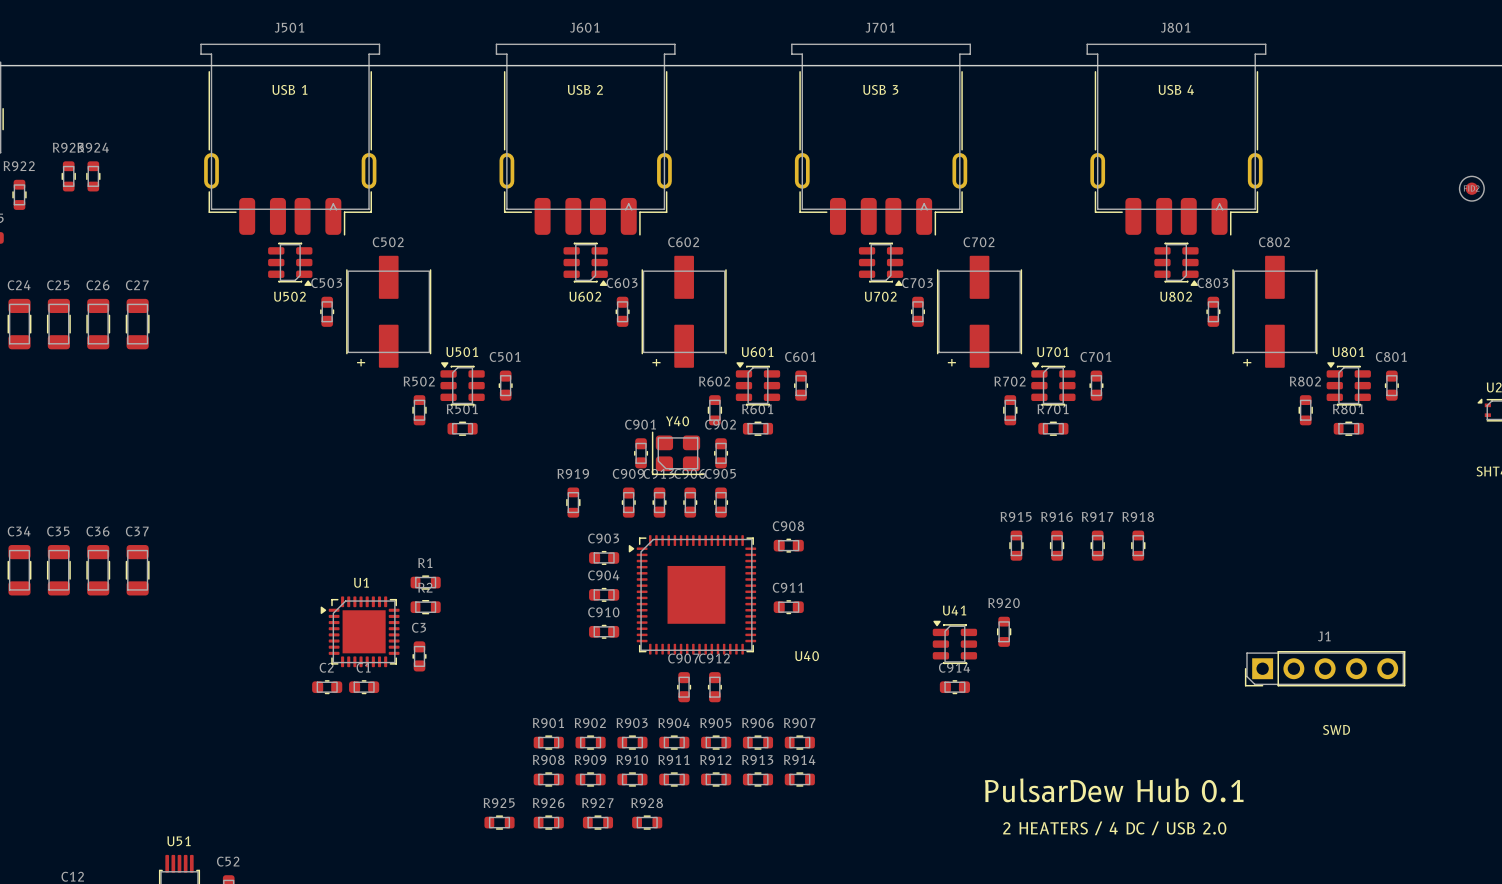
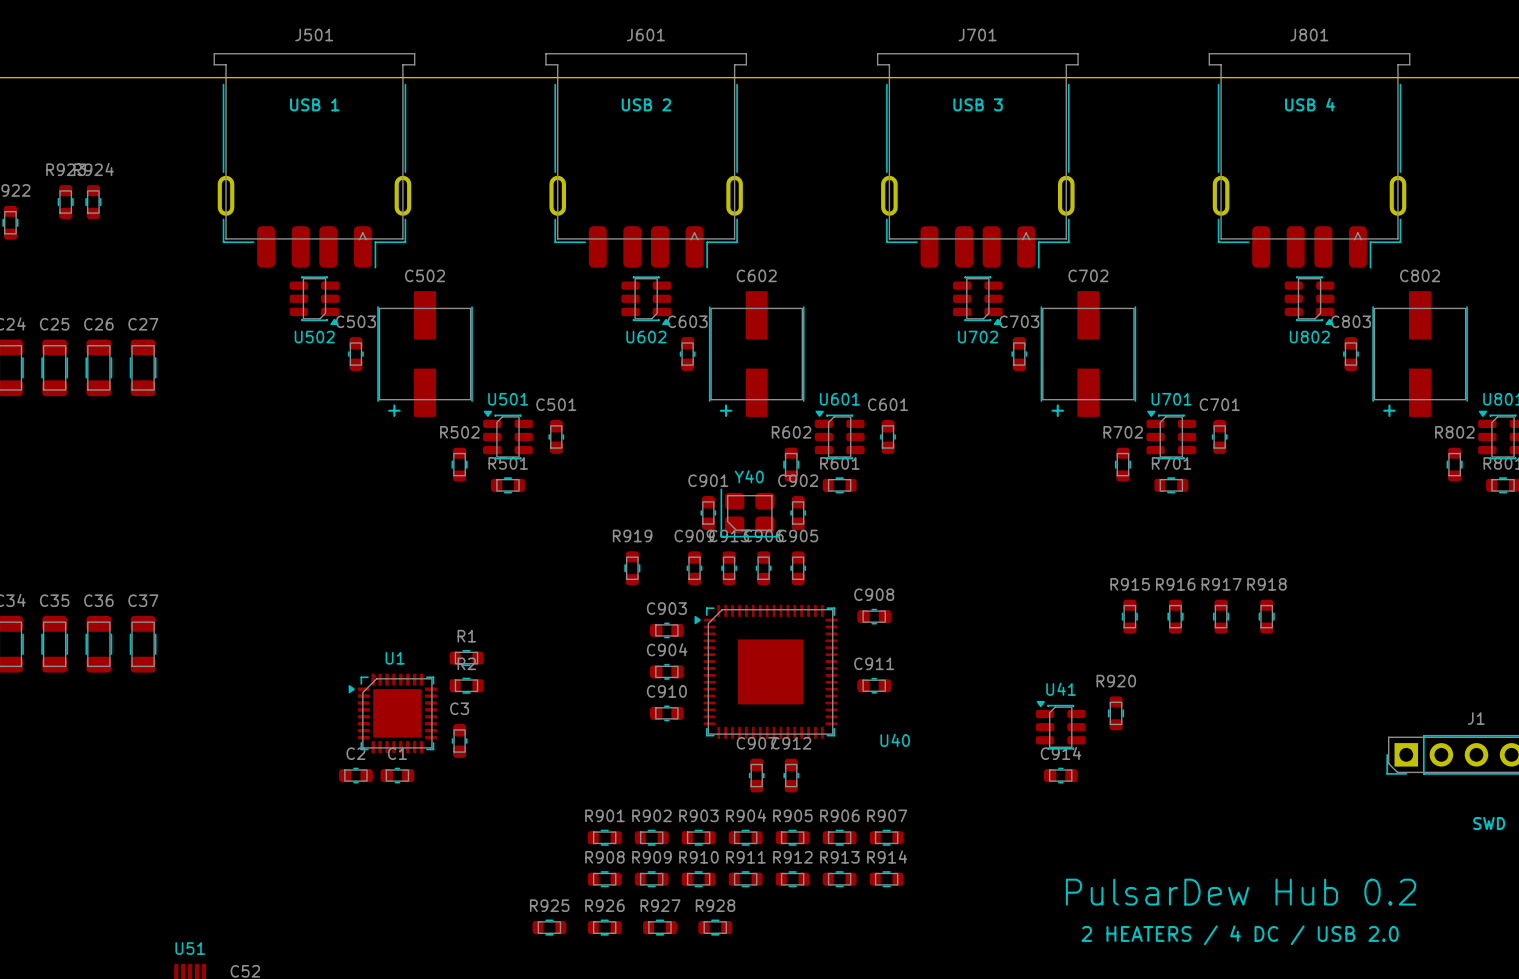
text: PulsarDew Hub 0.1 (1114, 790) -> PulsarDew Hub 0.2 (1241, 892)

